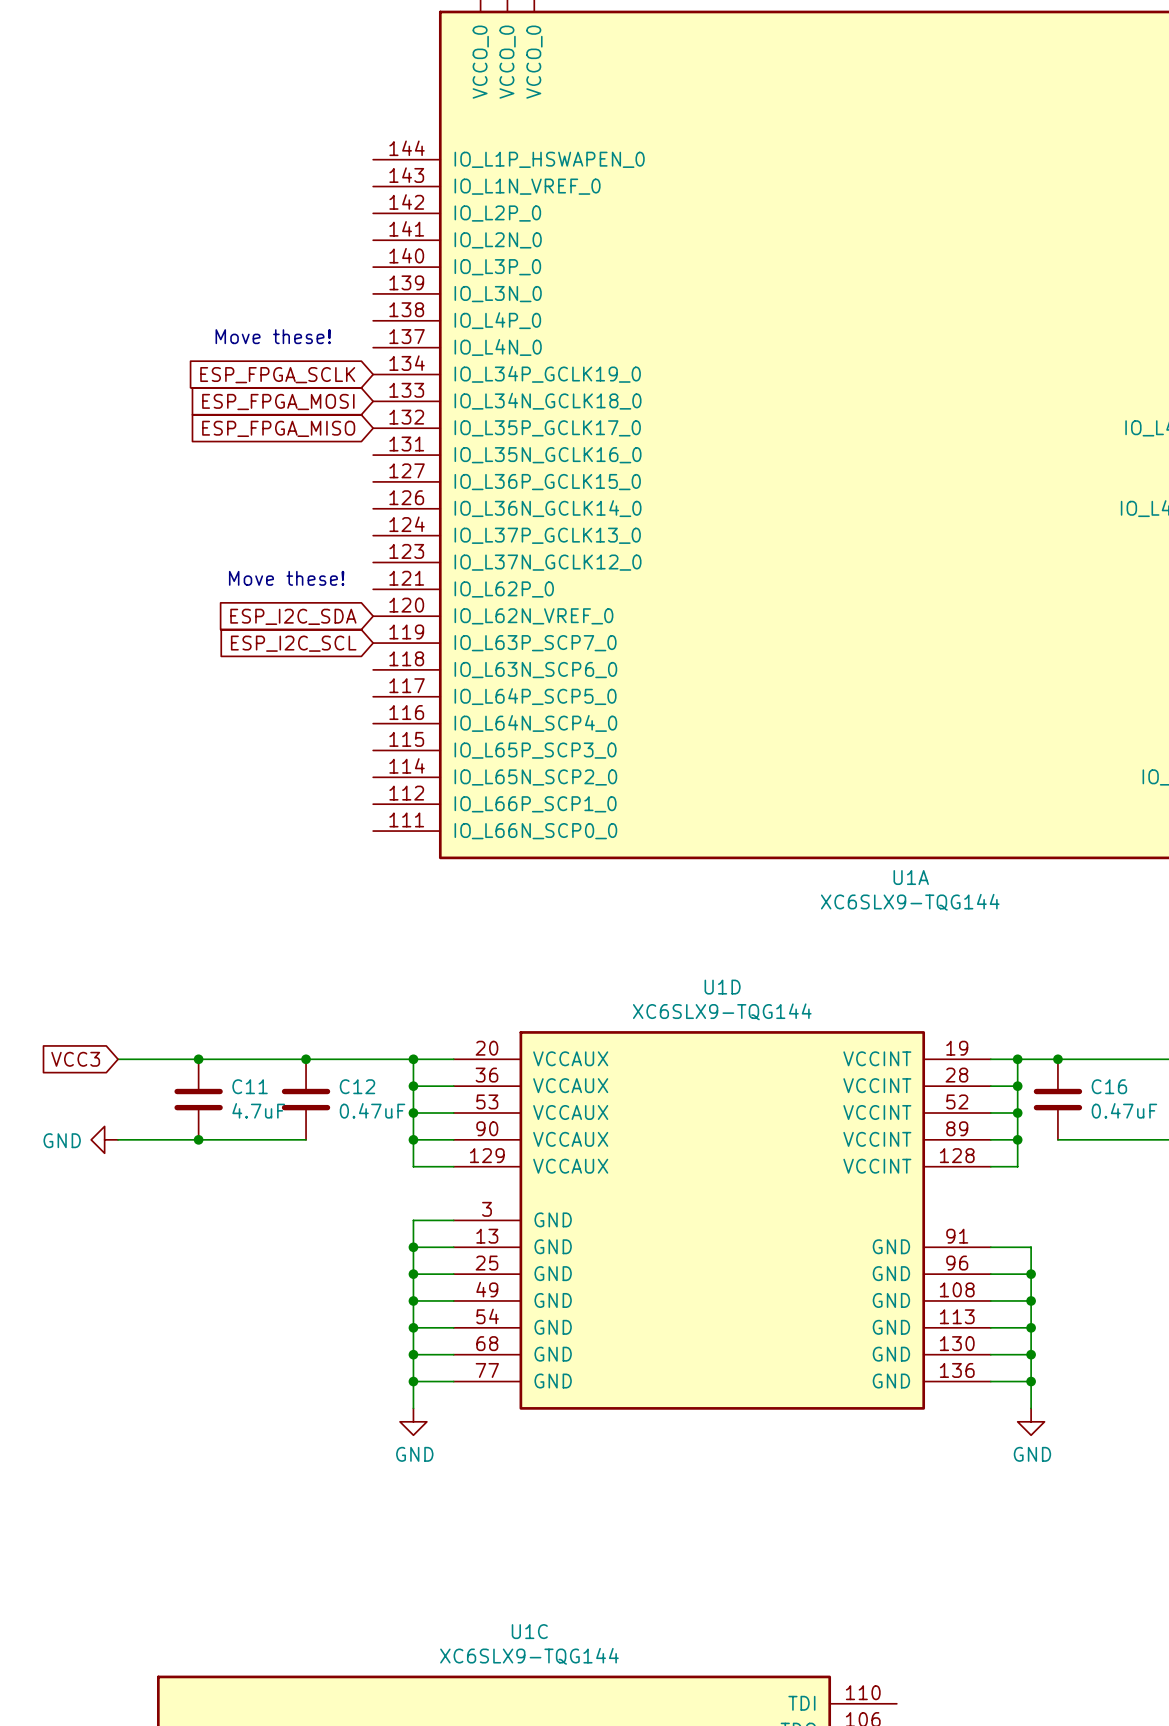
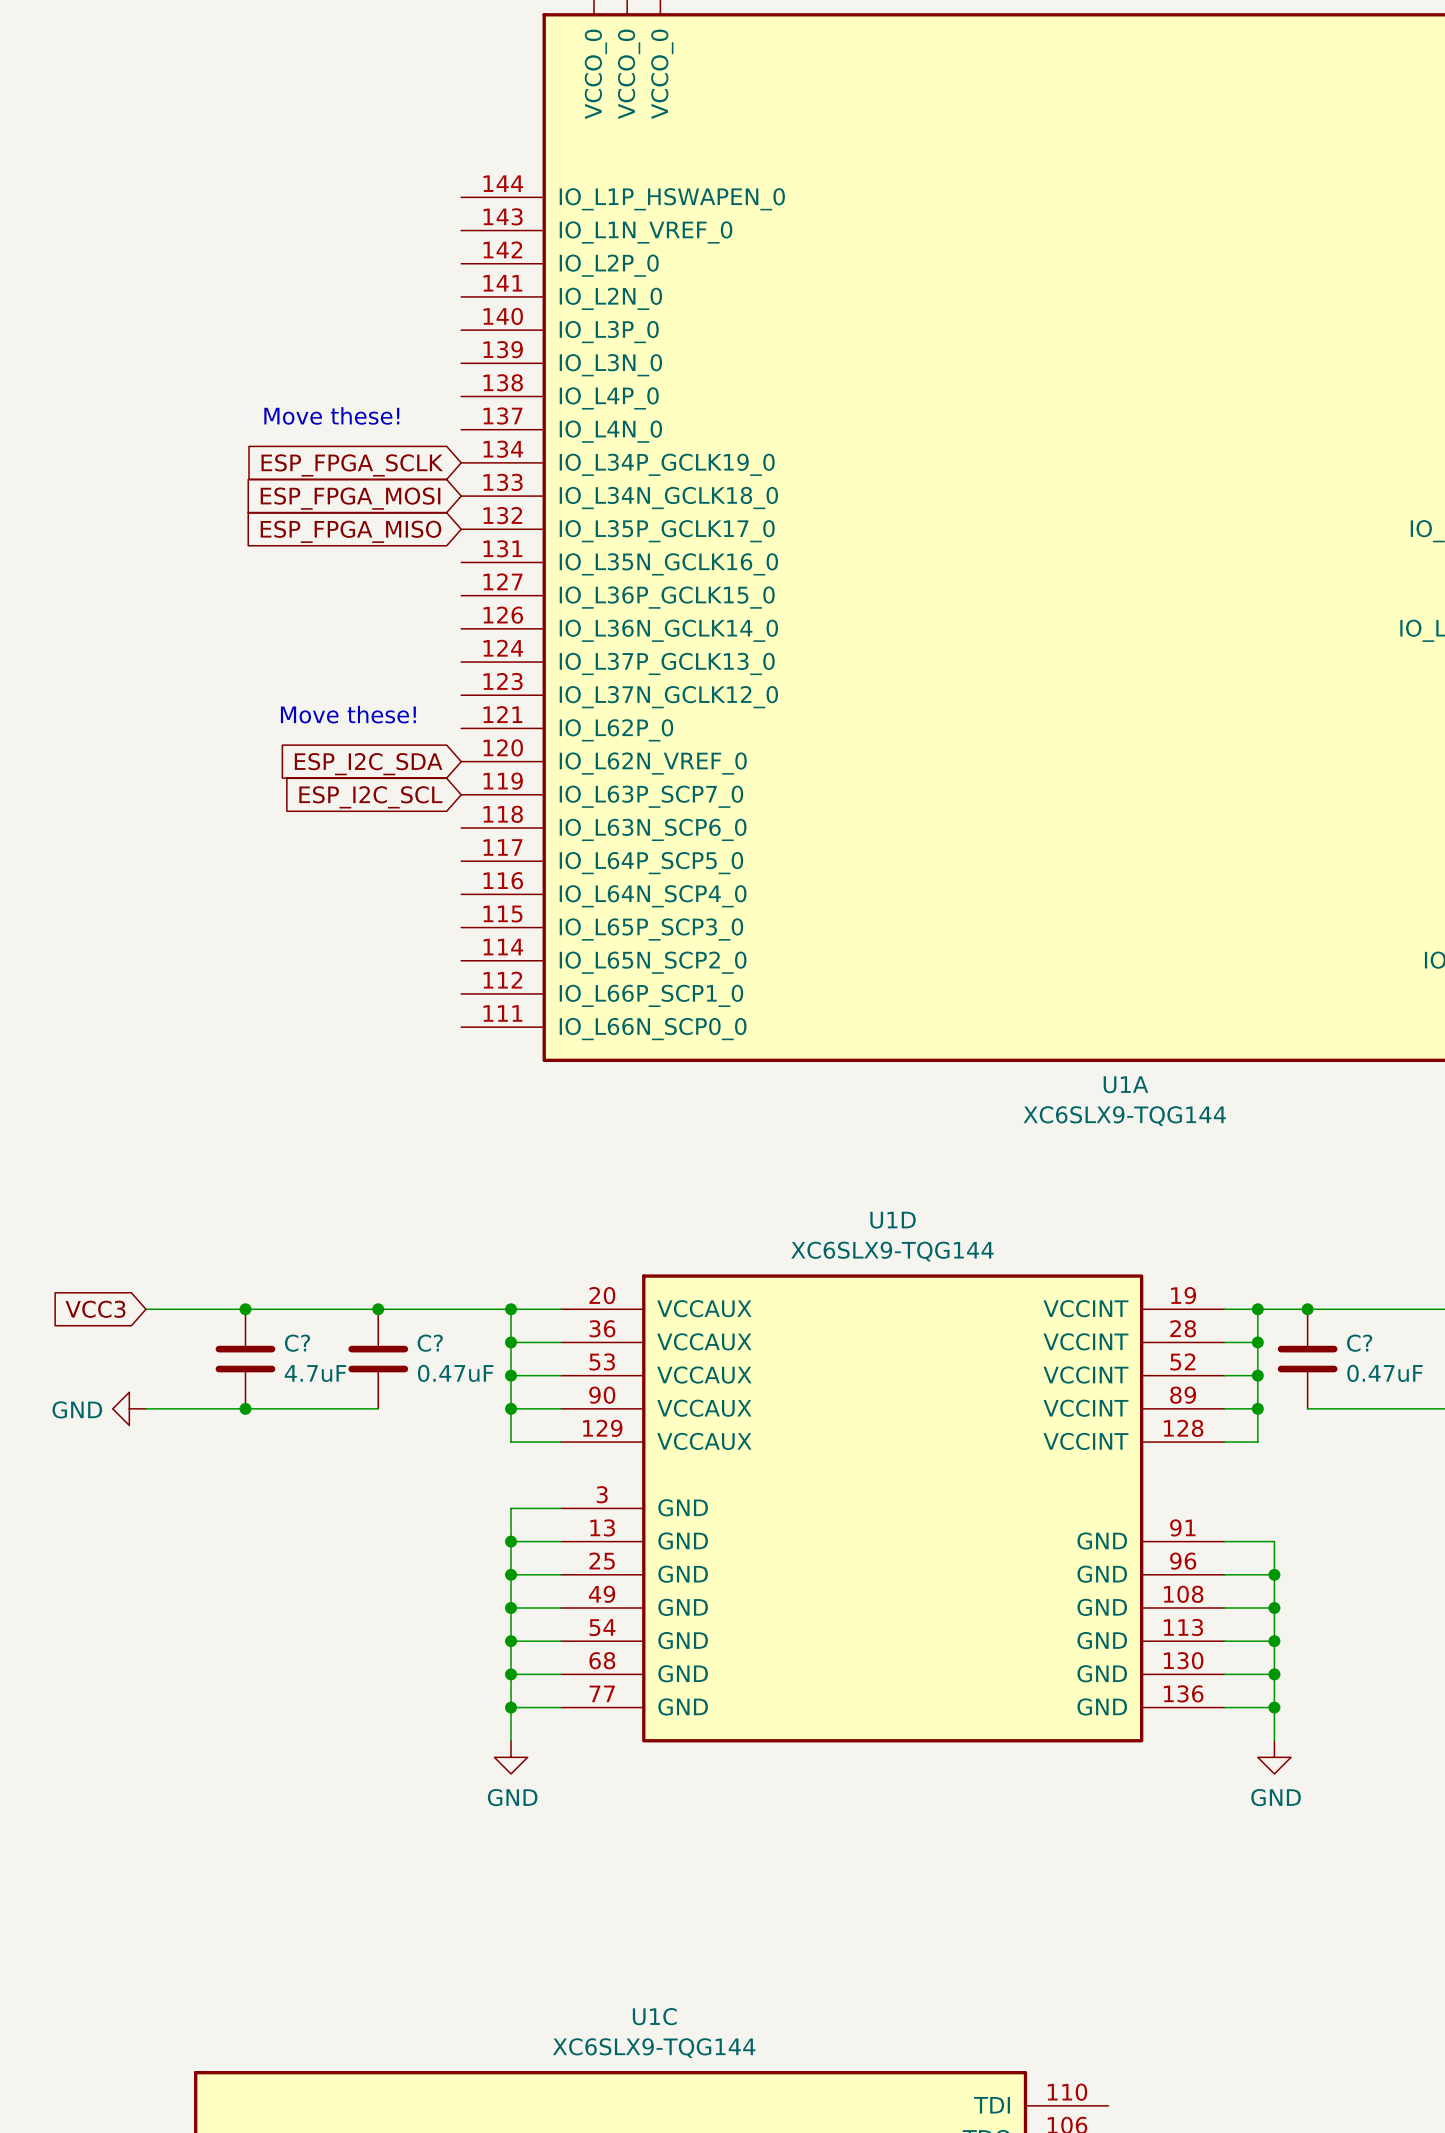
C11 name: C11 (250, 1086) -> C? (297, 1343)
C12 name: C12 (357, 1086) -> C? (430, 1343)
C16 name: C16 (1109, 1086) -> C? (1359, 1343)

